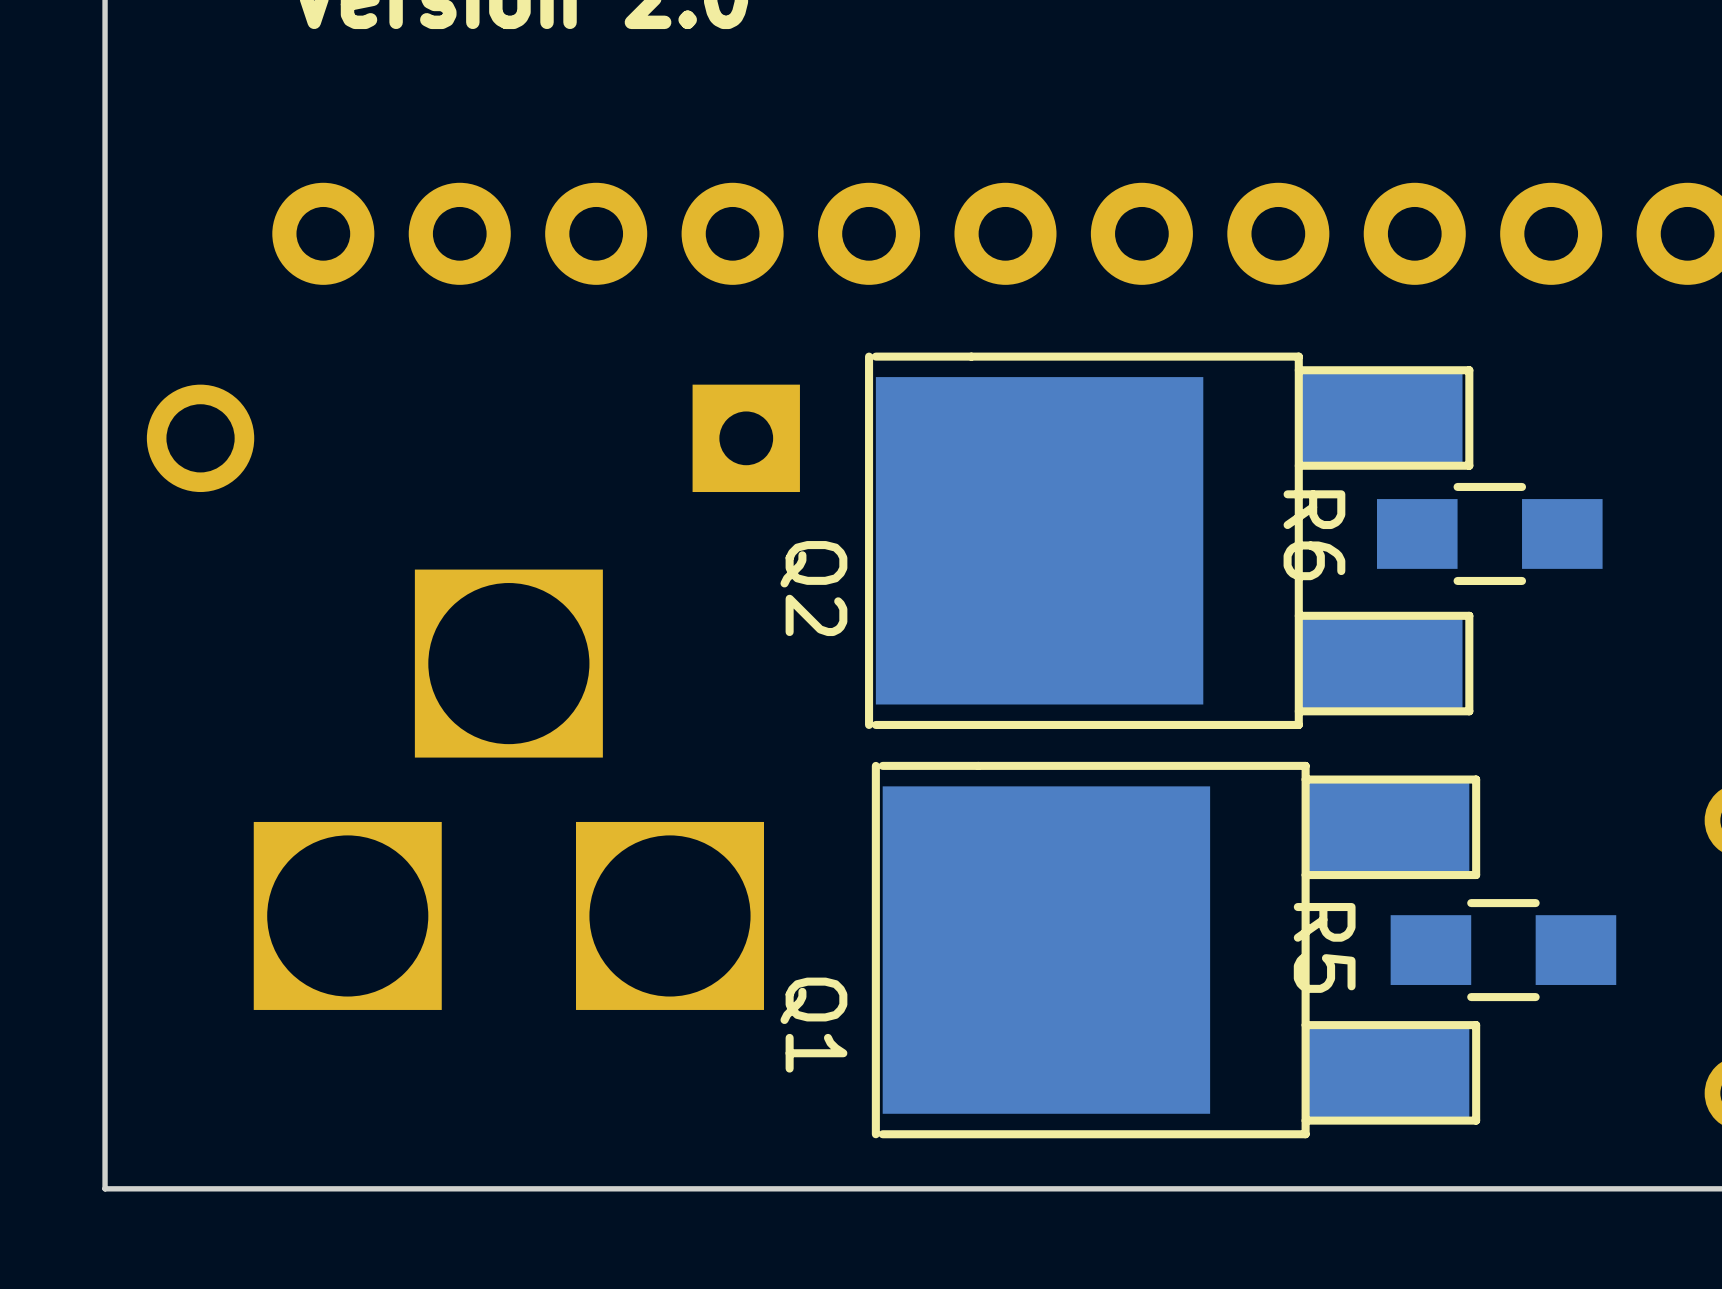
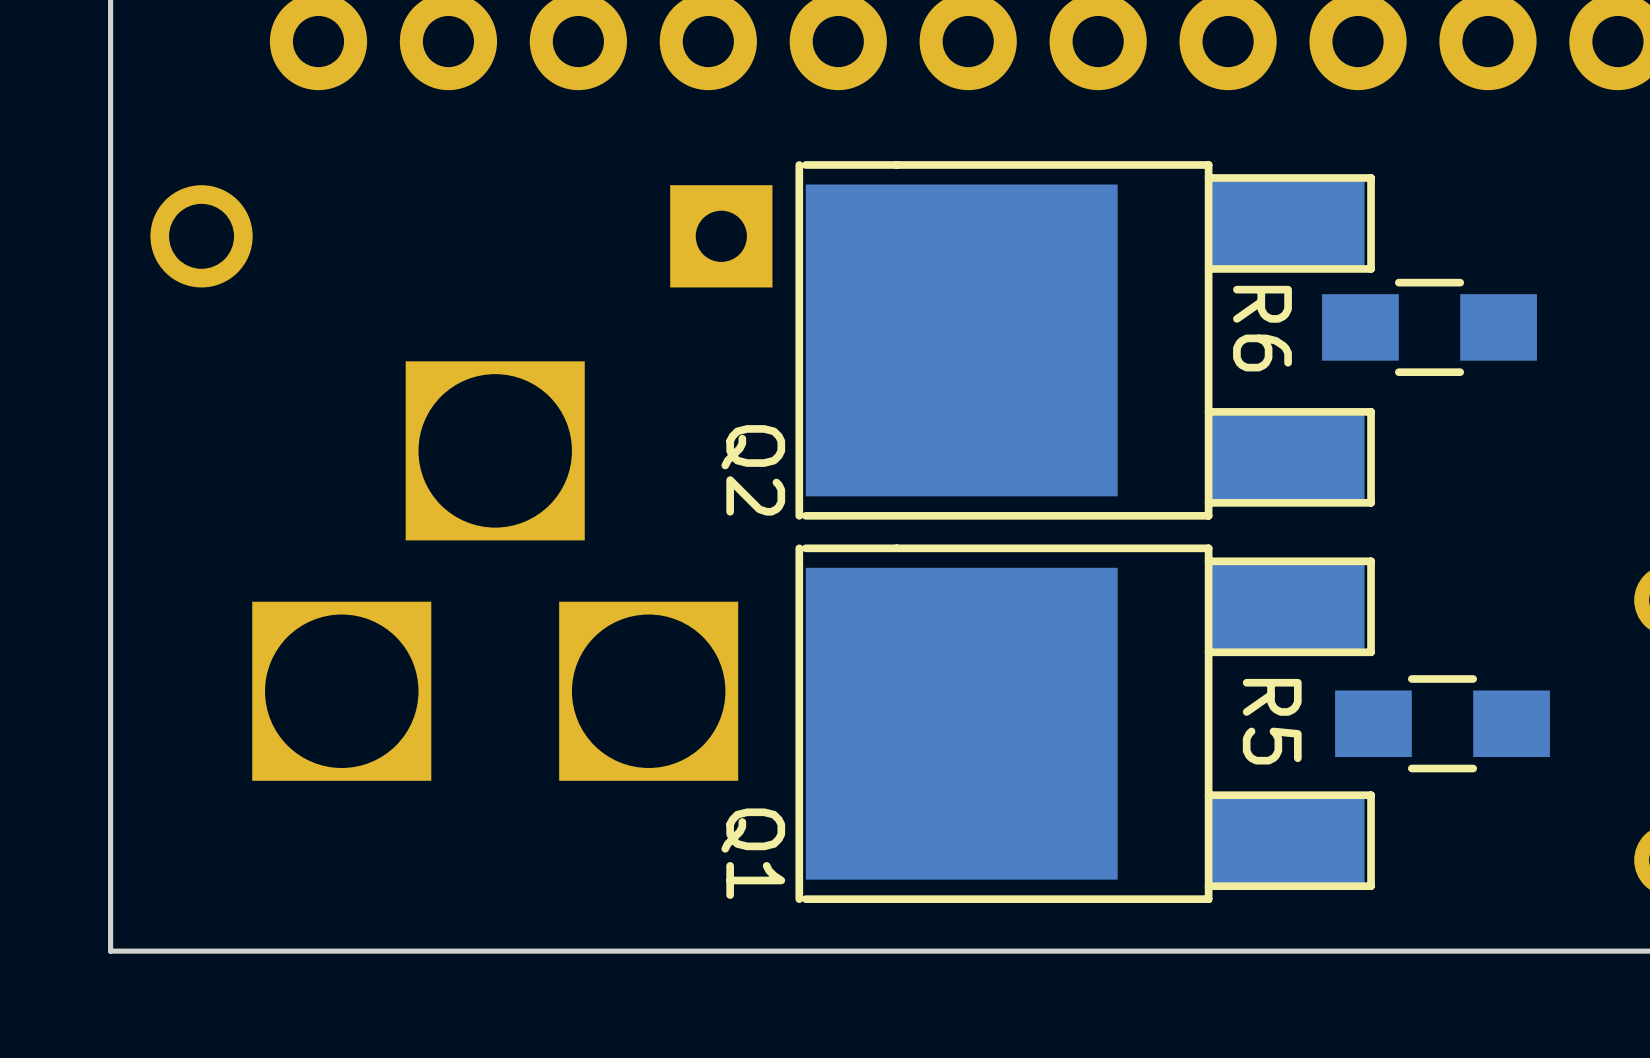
Q2 position: (1169, 540) -> (1085, 340)
Q2 name position: Q2 (813, 588) -> Q2 (753, 470)
Q1 position: (1176, 950) -> (1085, 723)
Q1 name position: Q1 (813, 1025) -> Q1 (753, 853)

